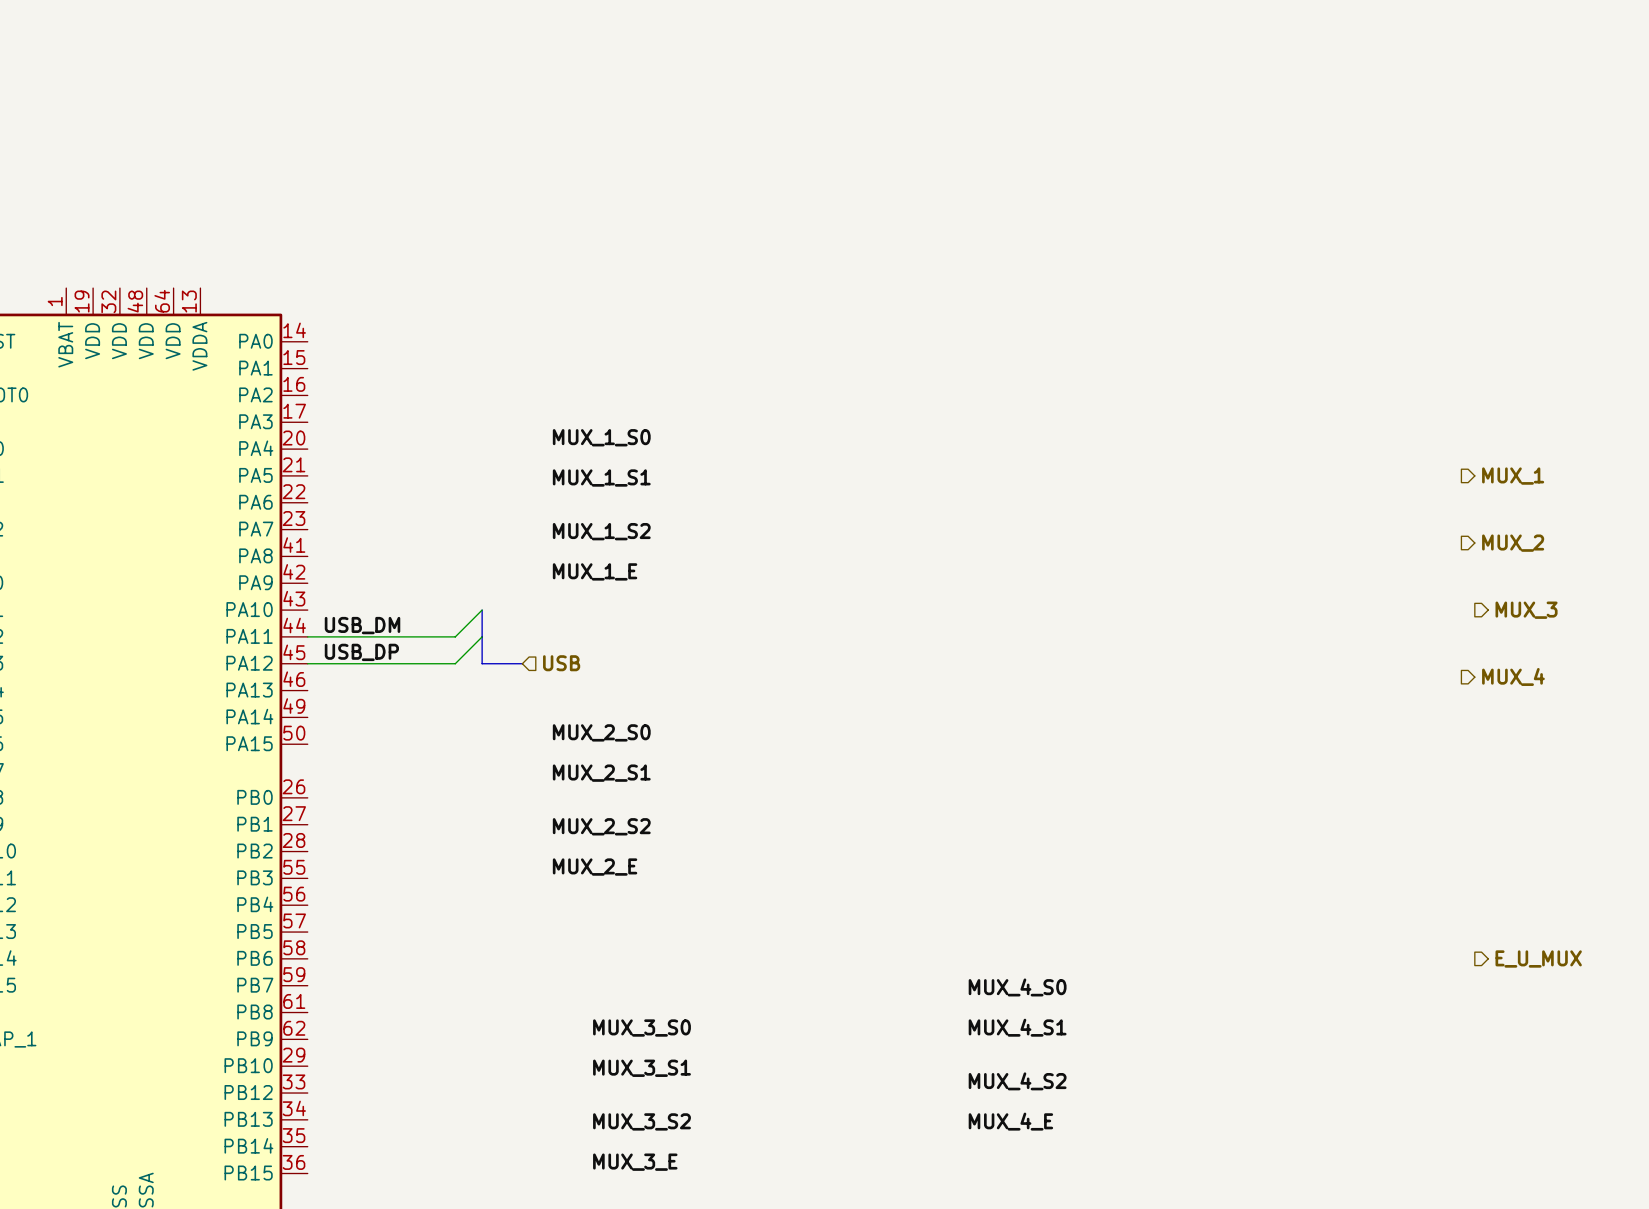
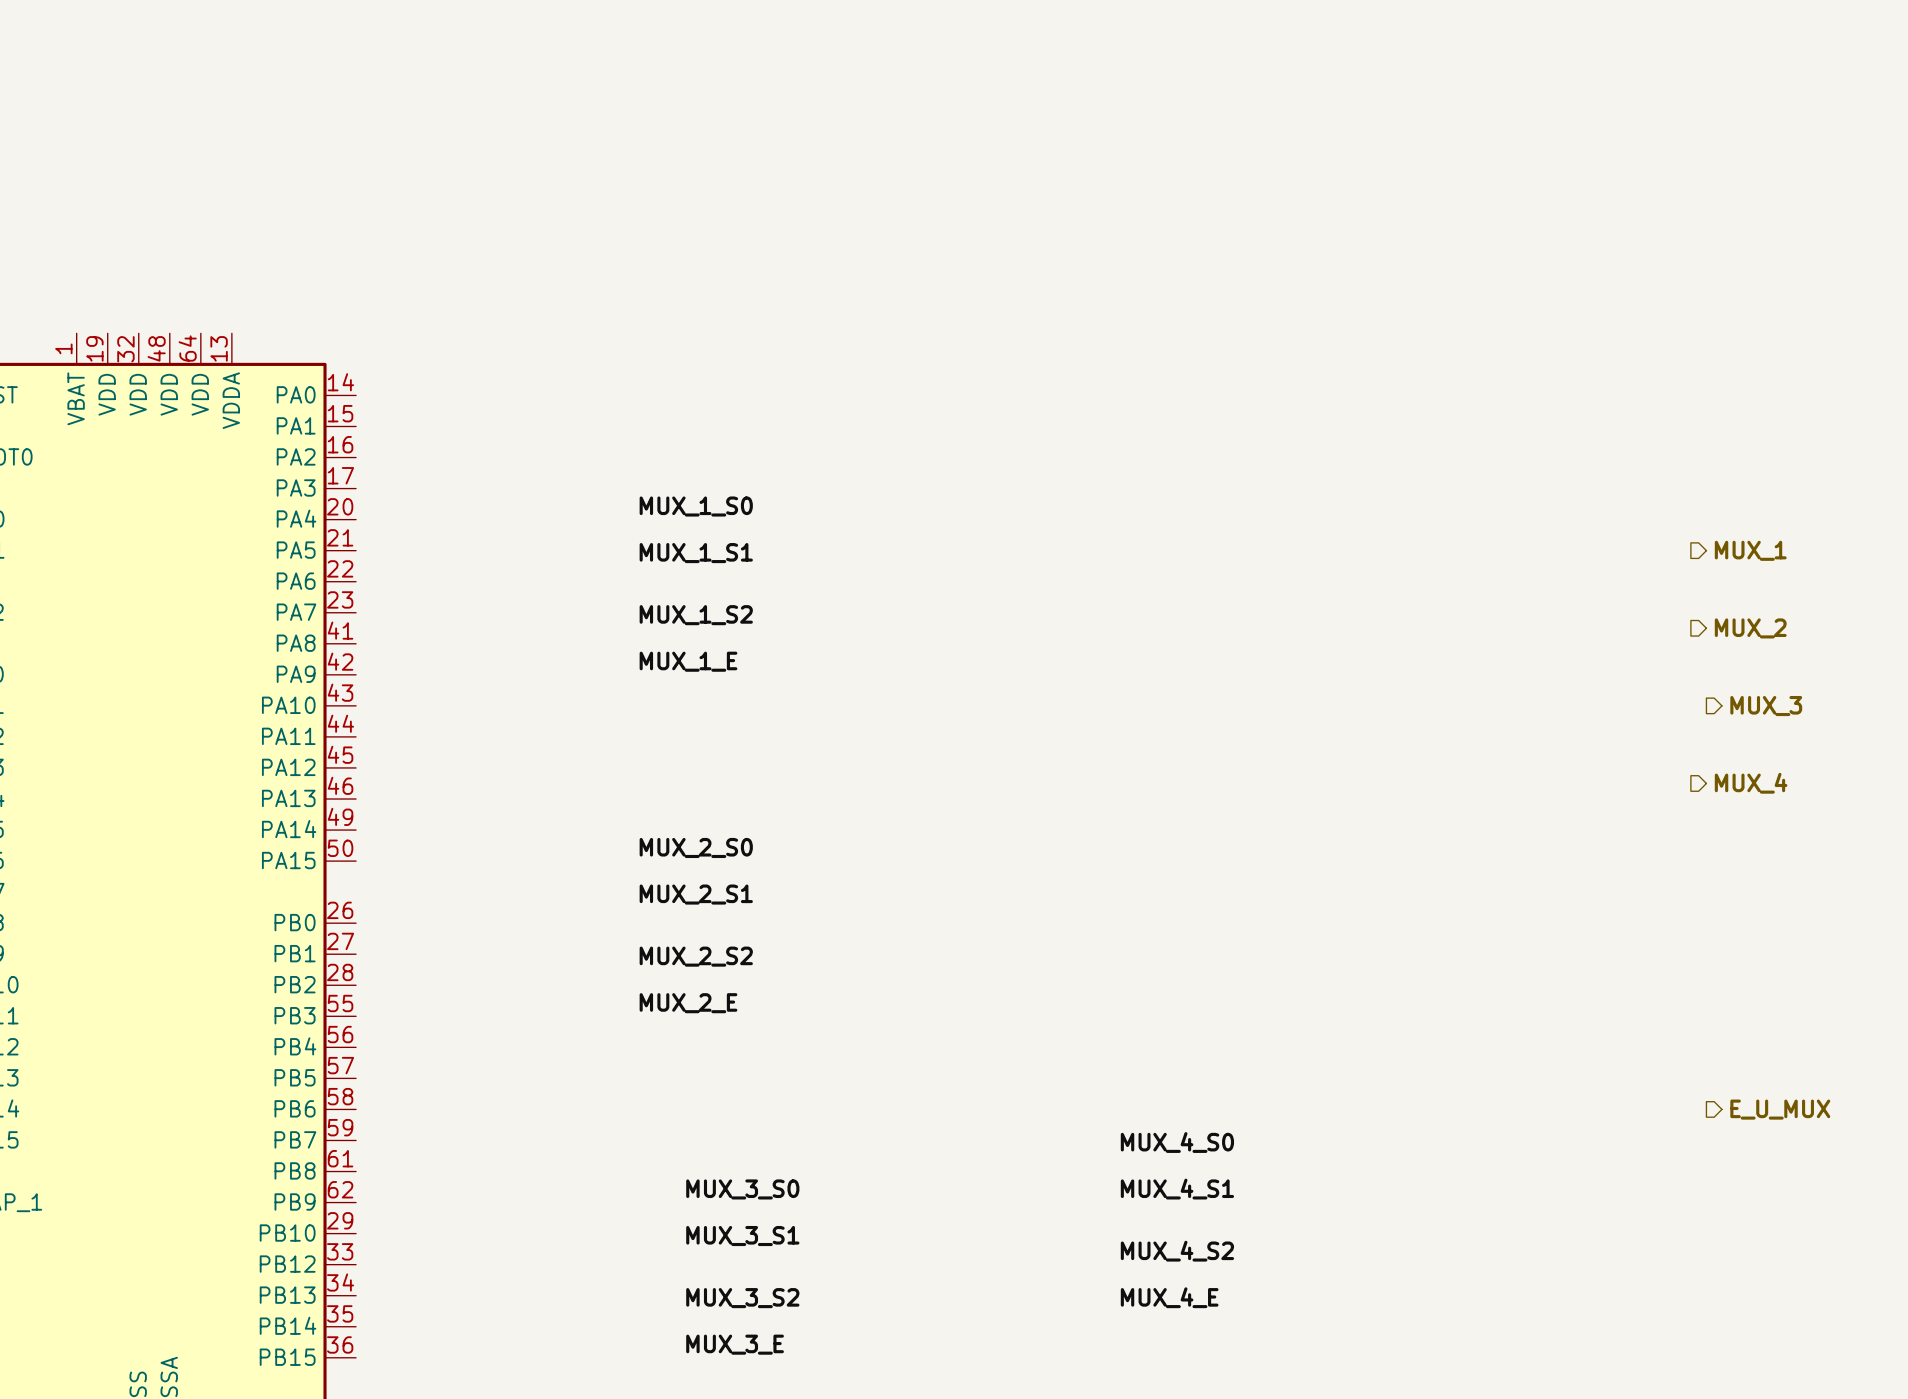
wire: (482, 610) (455, 636) (307, 636) -> none
bus: (482, 610) (482, 663) (522, 663) -> none
label: USB_DM (362, 625) -> none
wire: (482, 636) (455, 663) (307, 663) -> none
label: USB_DP (361, 652) -> none
hierarchical label: USB (561, 663) -> none

